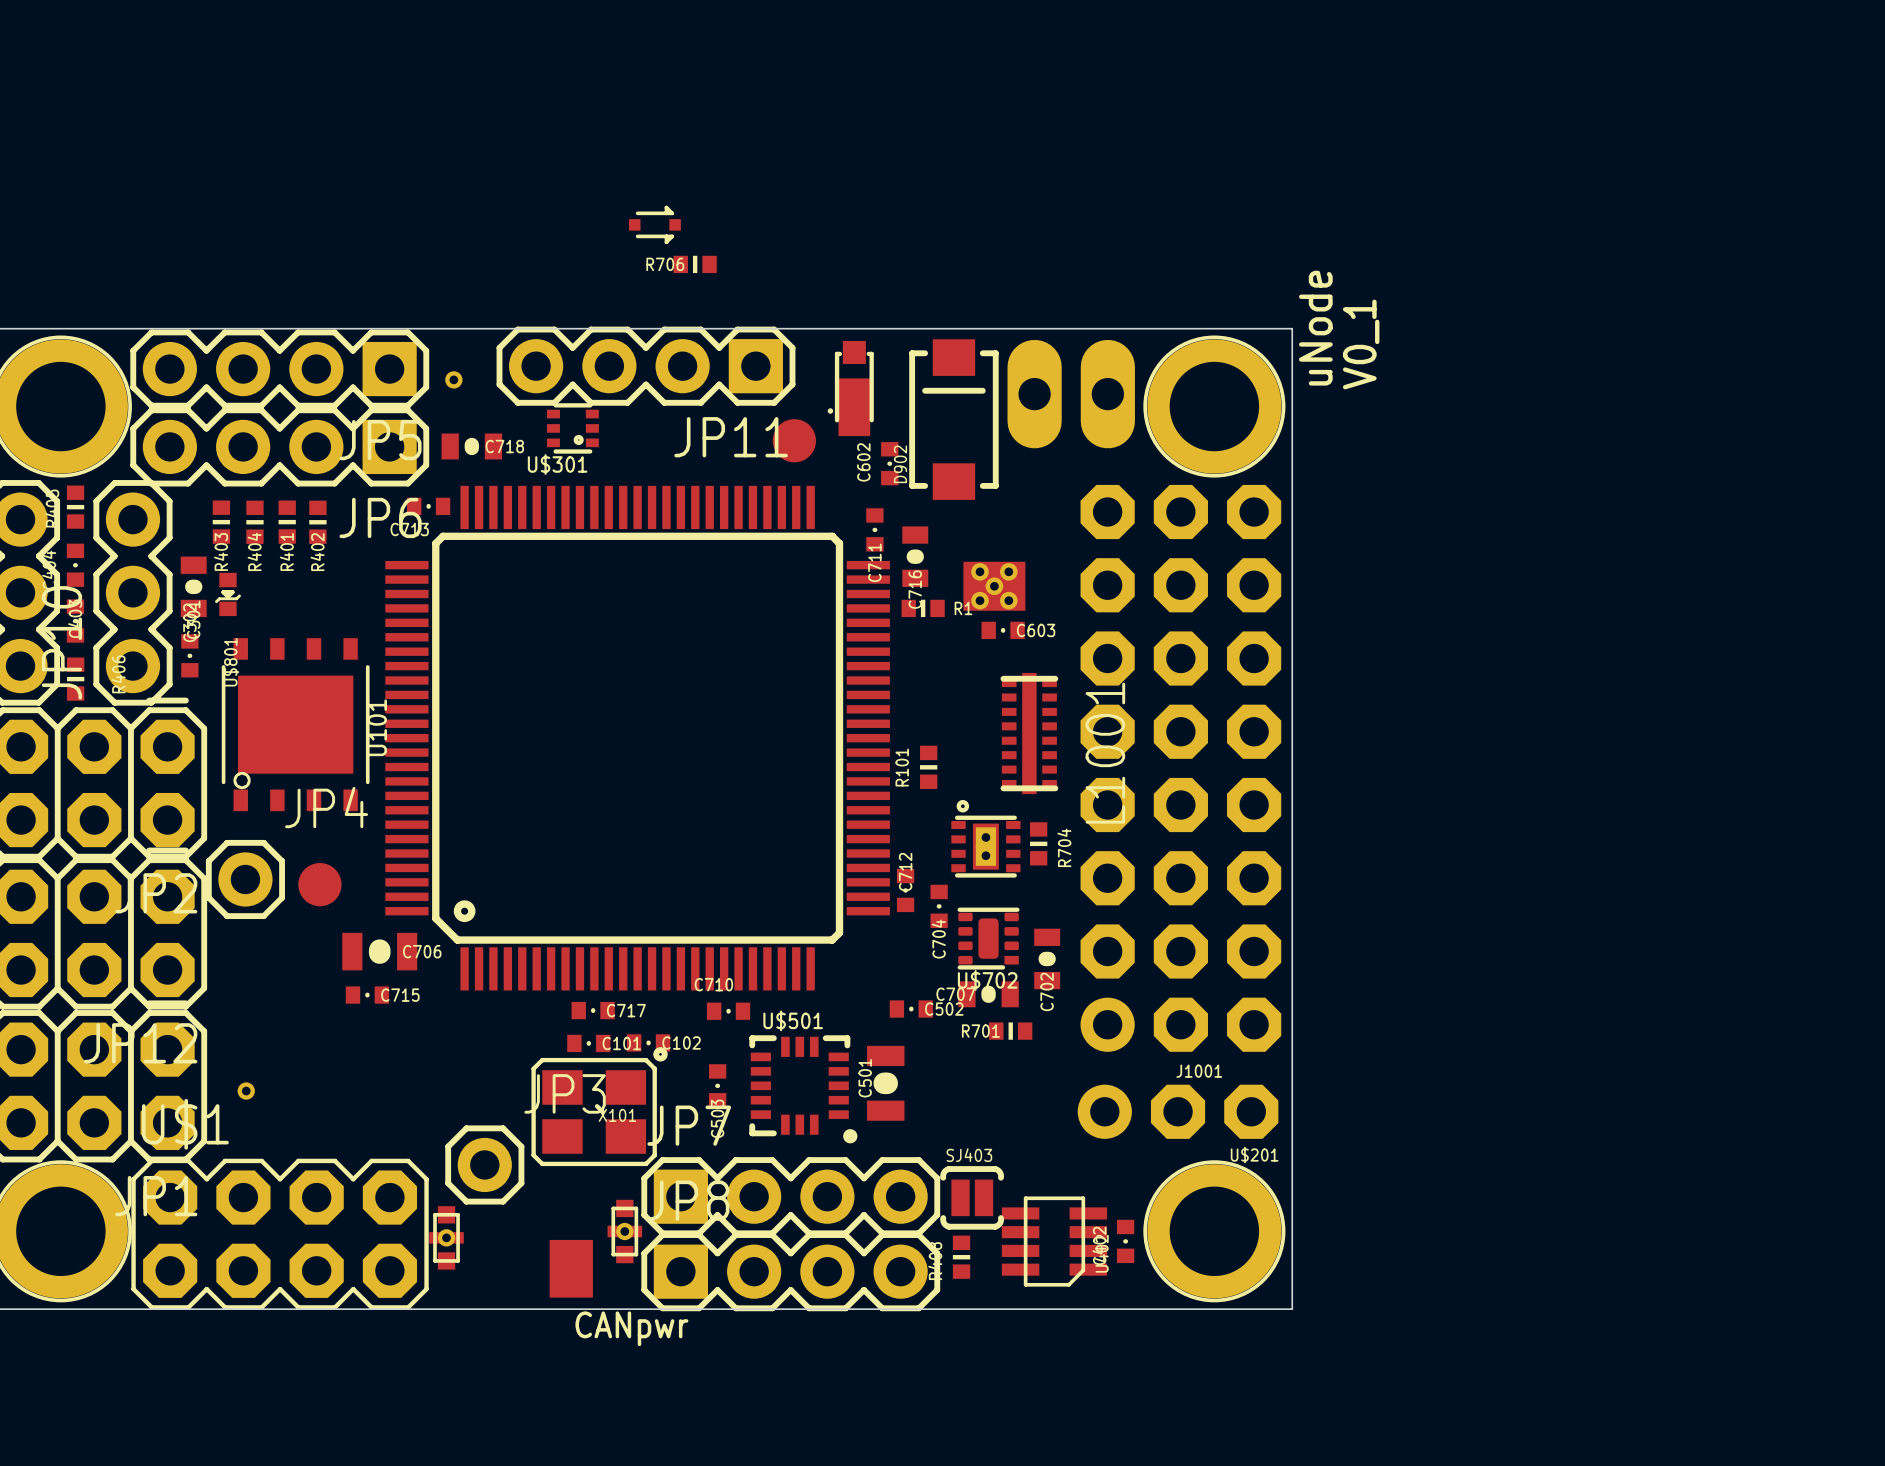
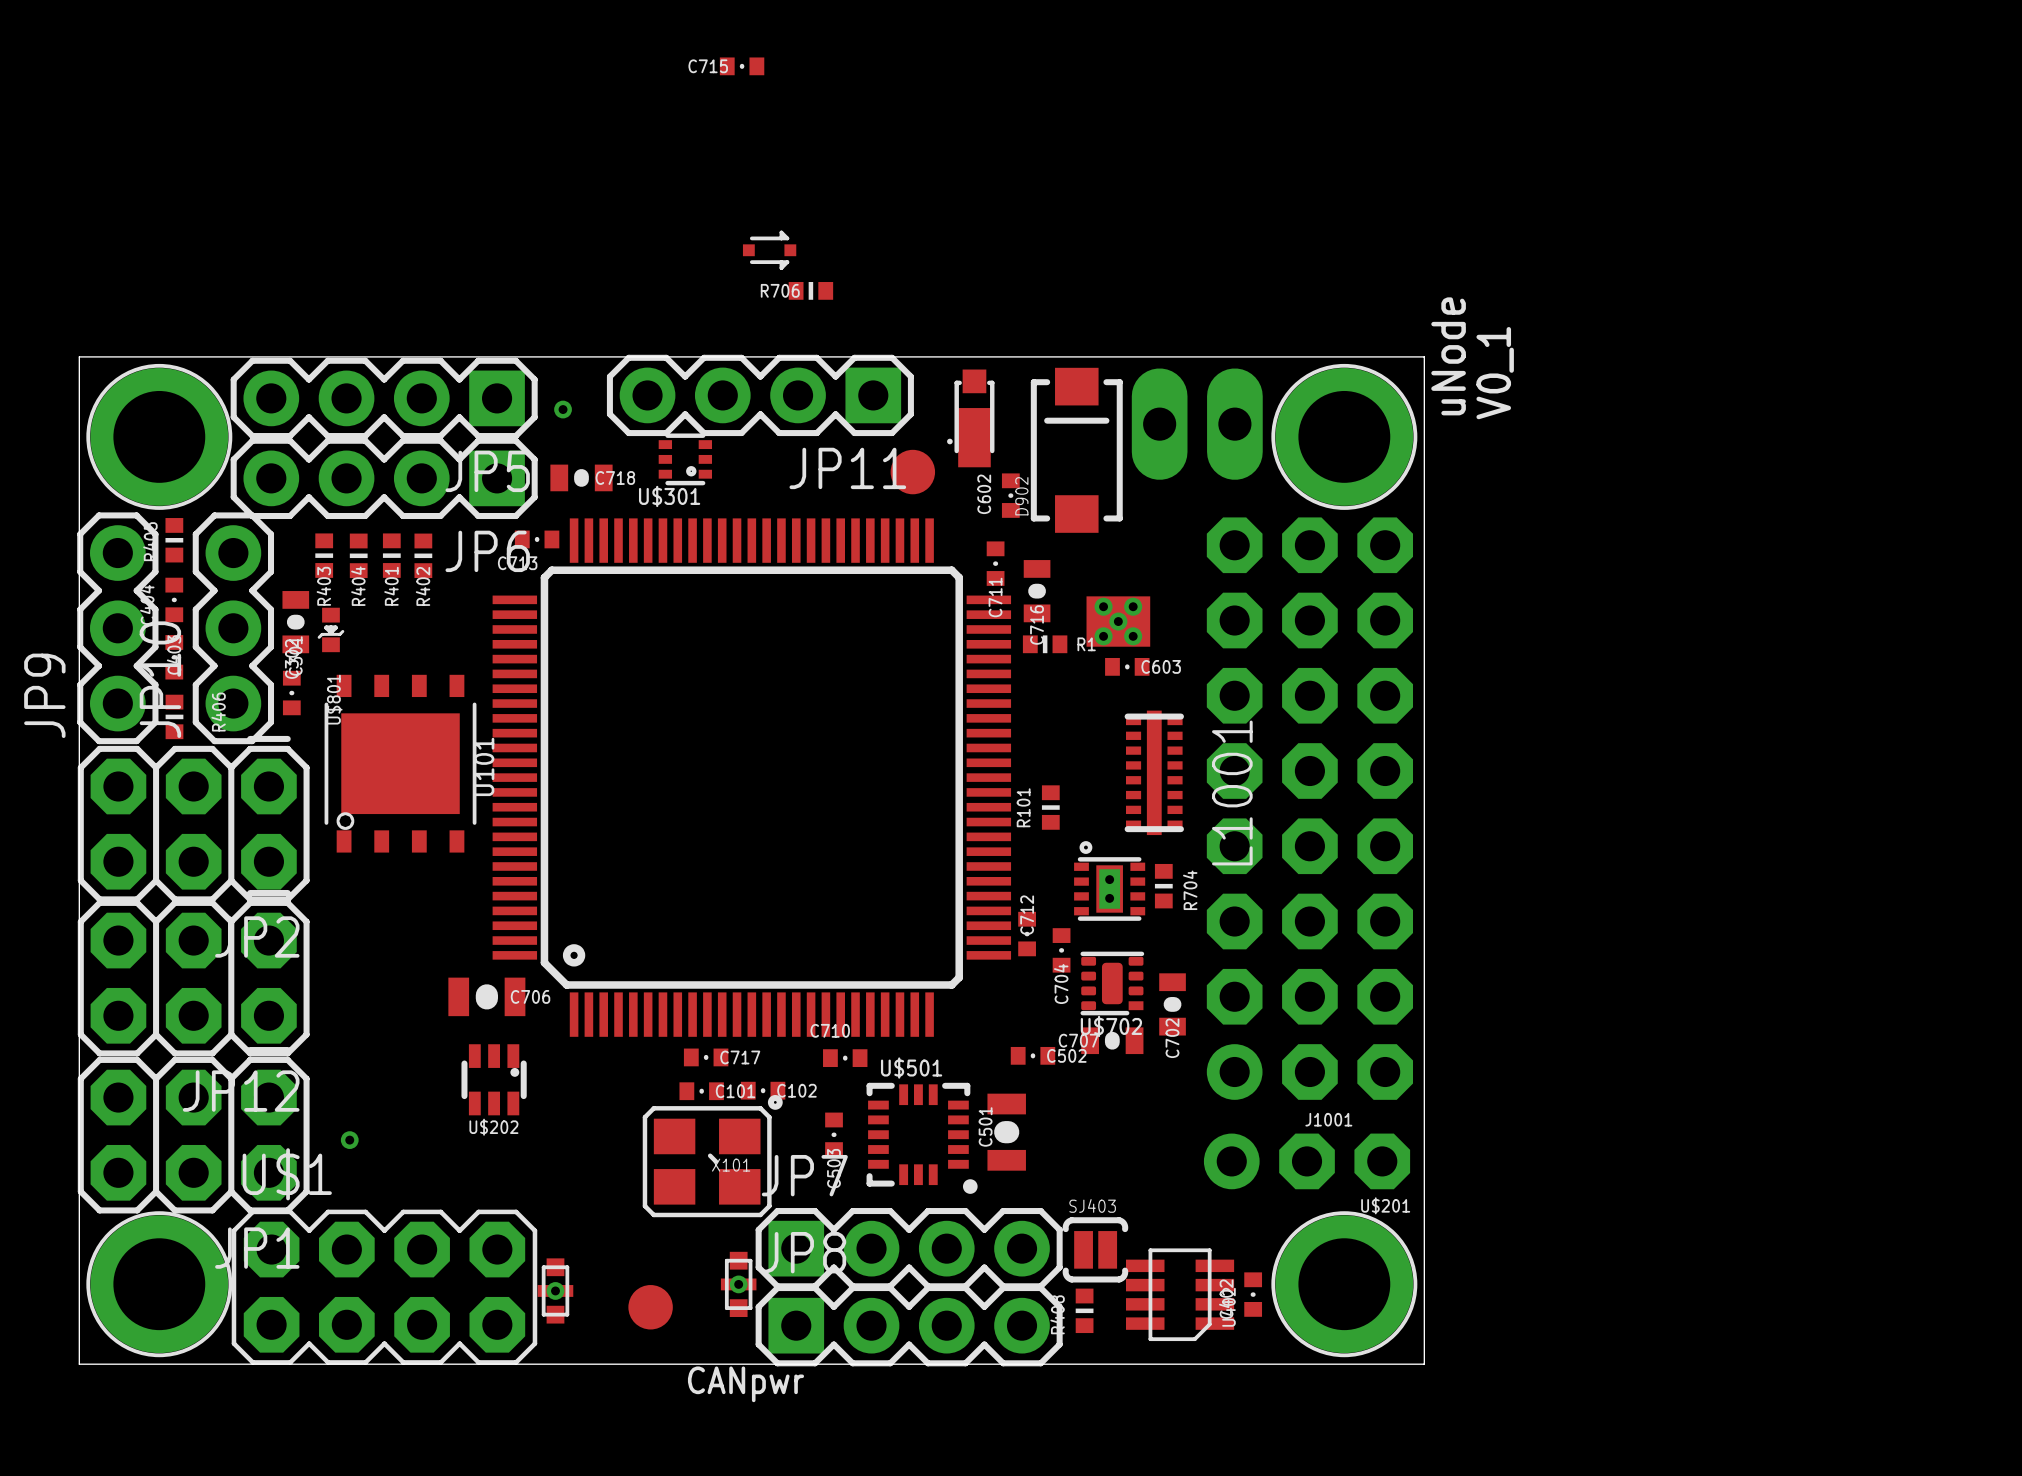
JP4: (245, 879) -> none
part position: (319, 884) -> (650, 1307)
C715 position: (367, 995) -> (742, 66)
C715 name position: C715 (400, 995) -> C715 (708, 66)
R701: (1010, 1031) -> none
U$202: none -> (494, 1079)
JP3: (484, 1164) -> none
part: (571, 1268) -> none

